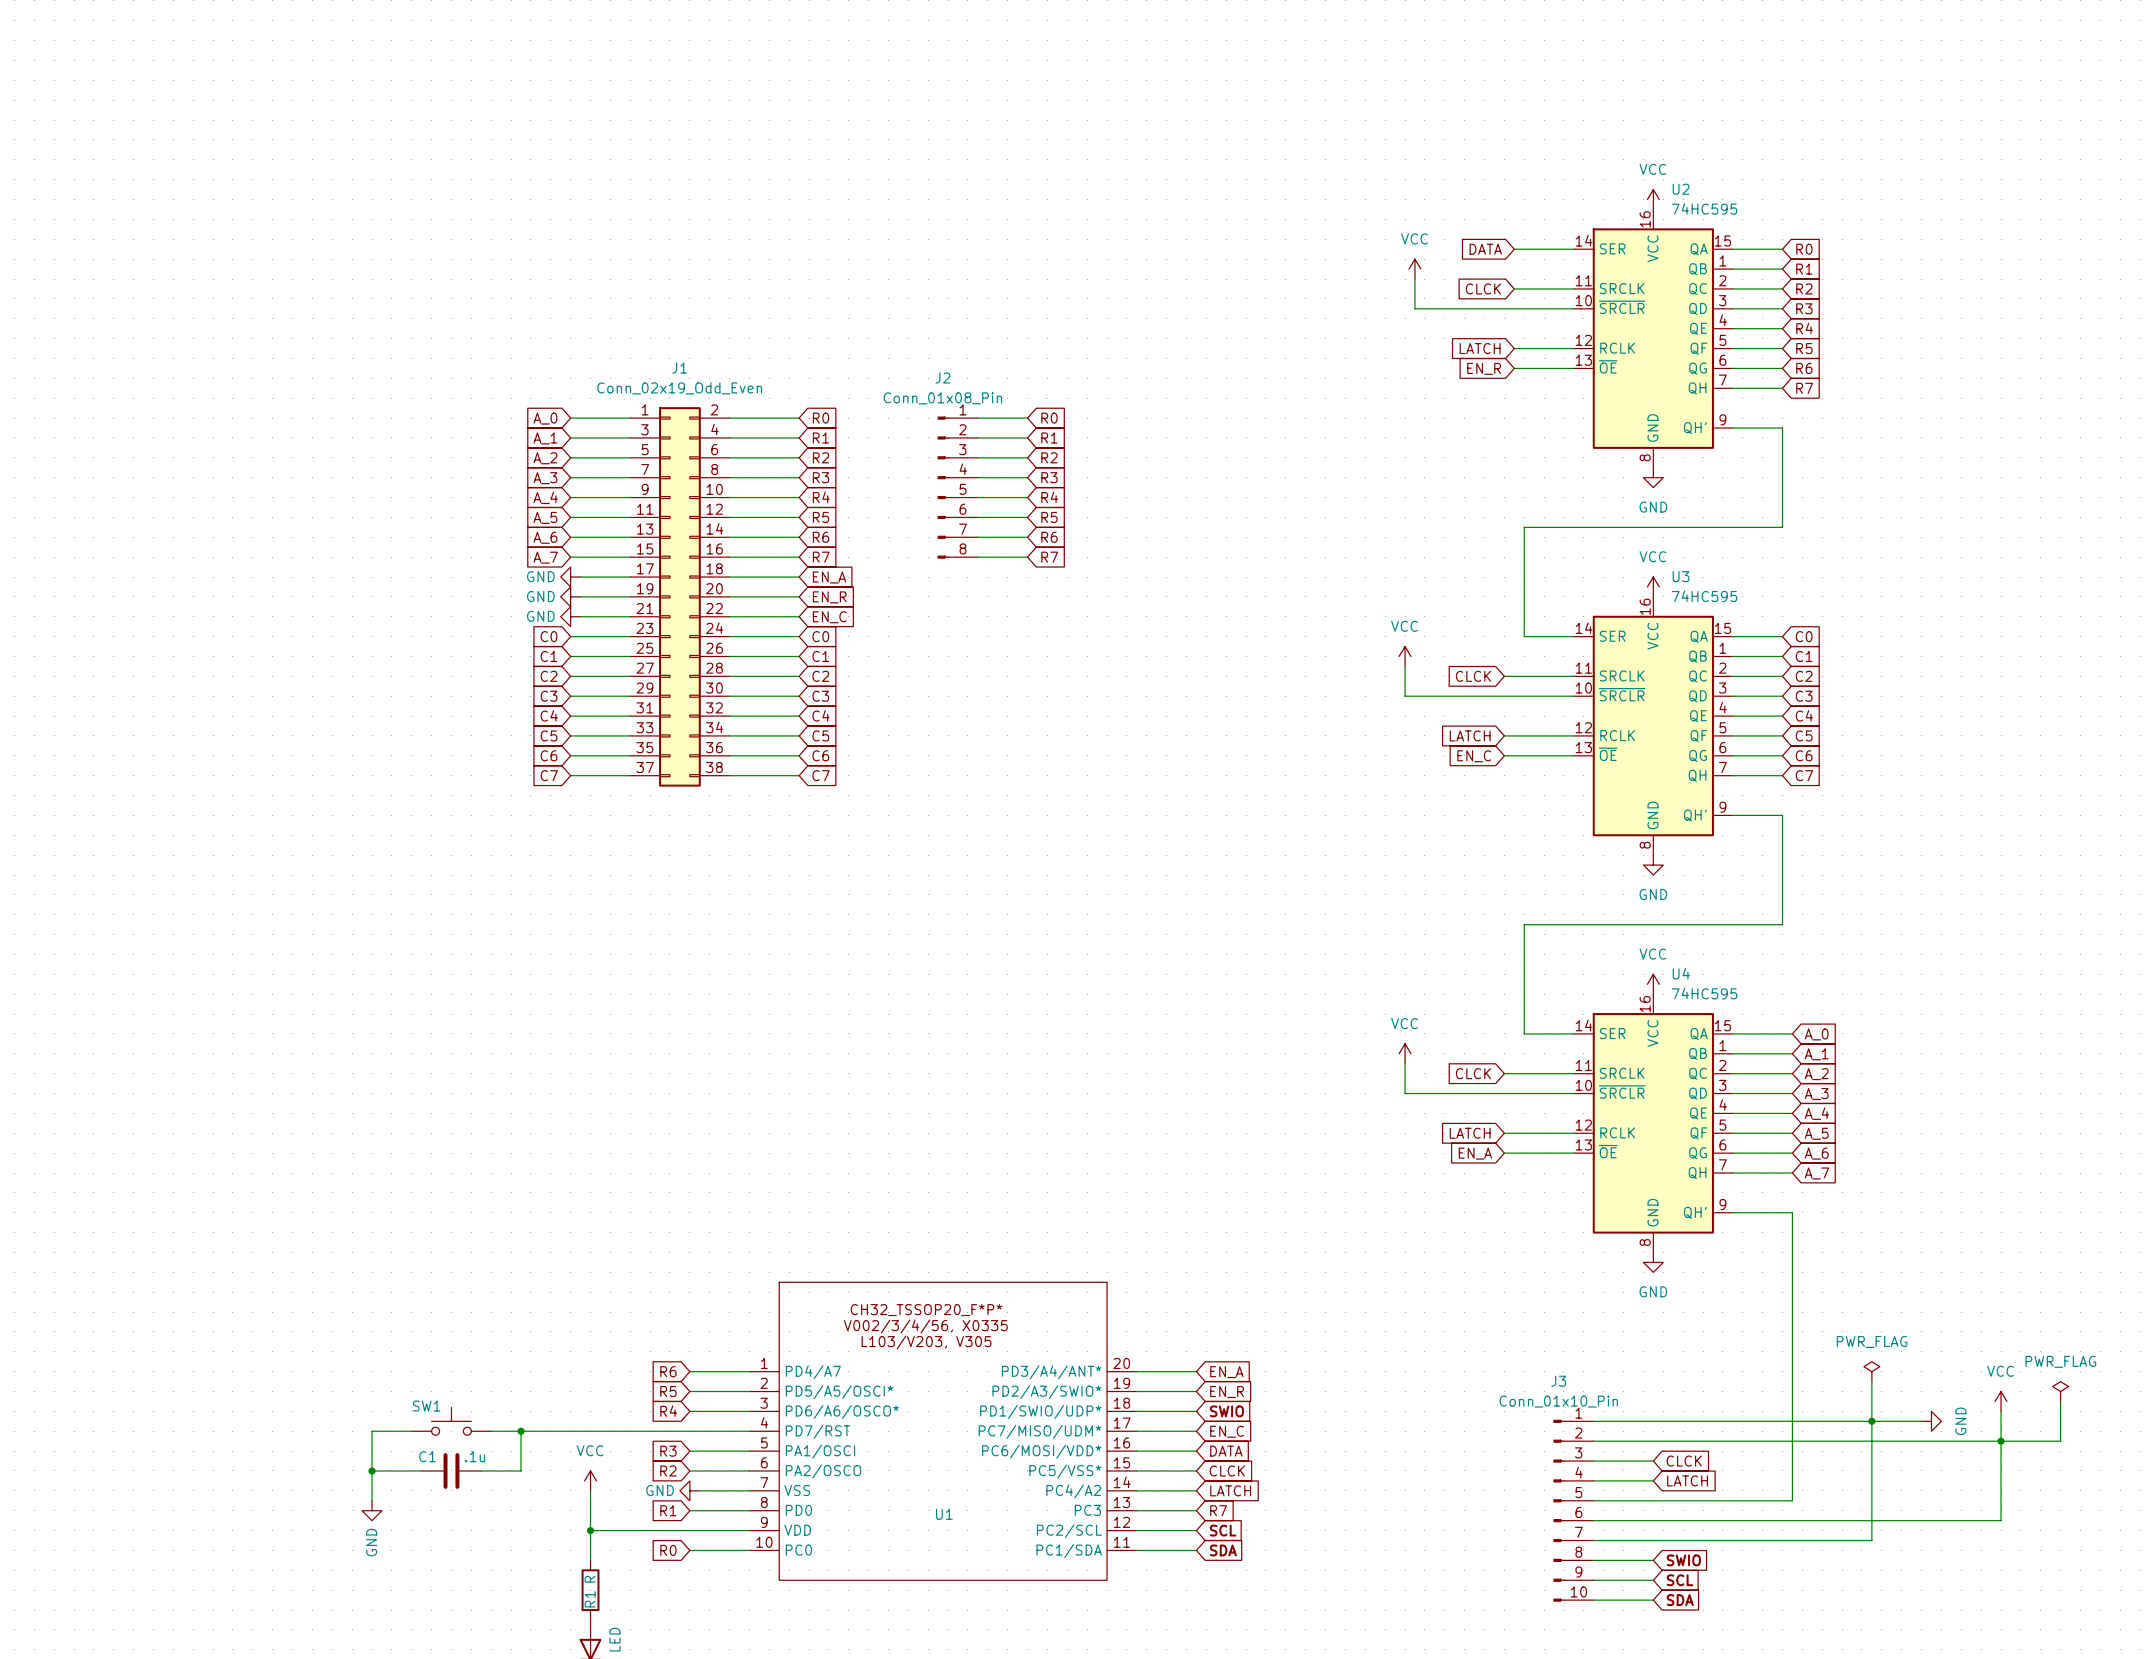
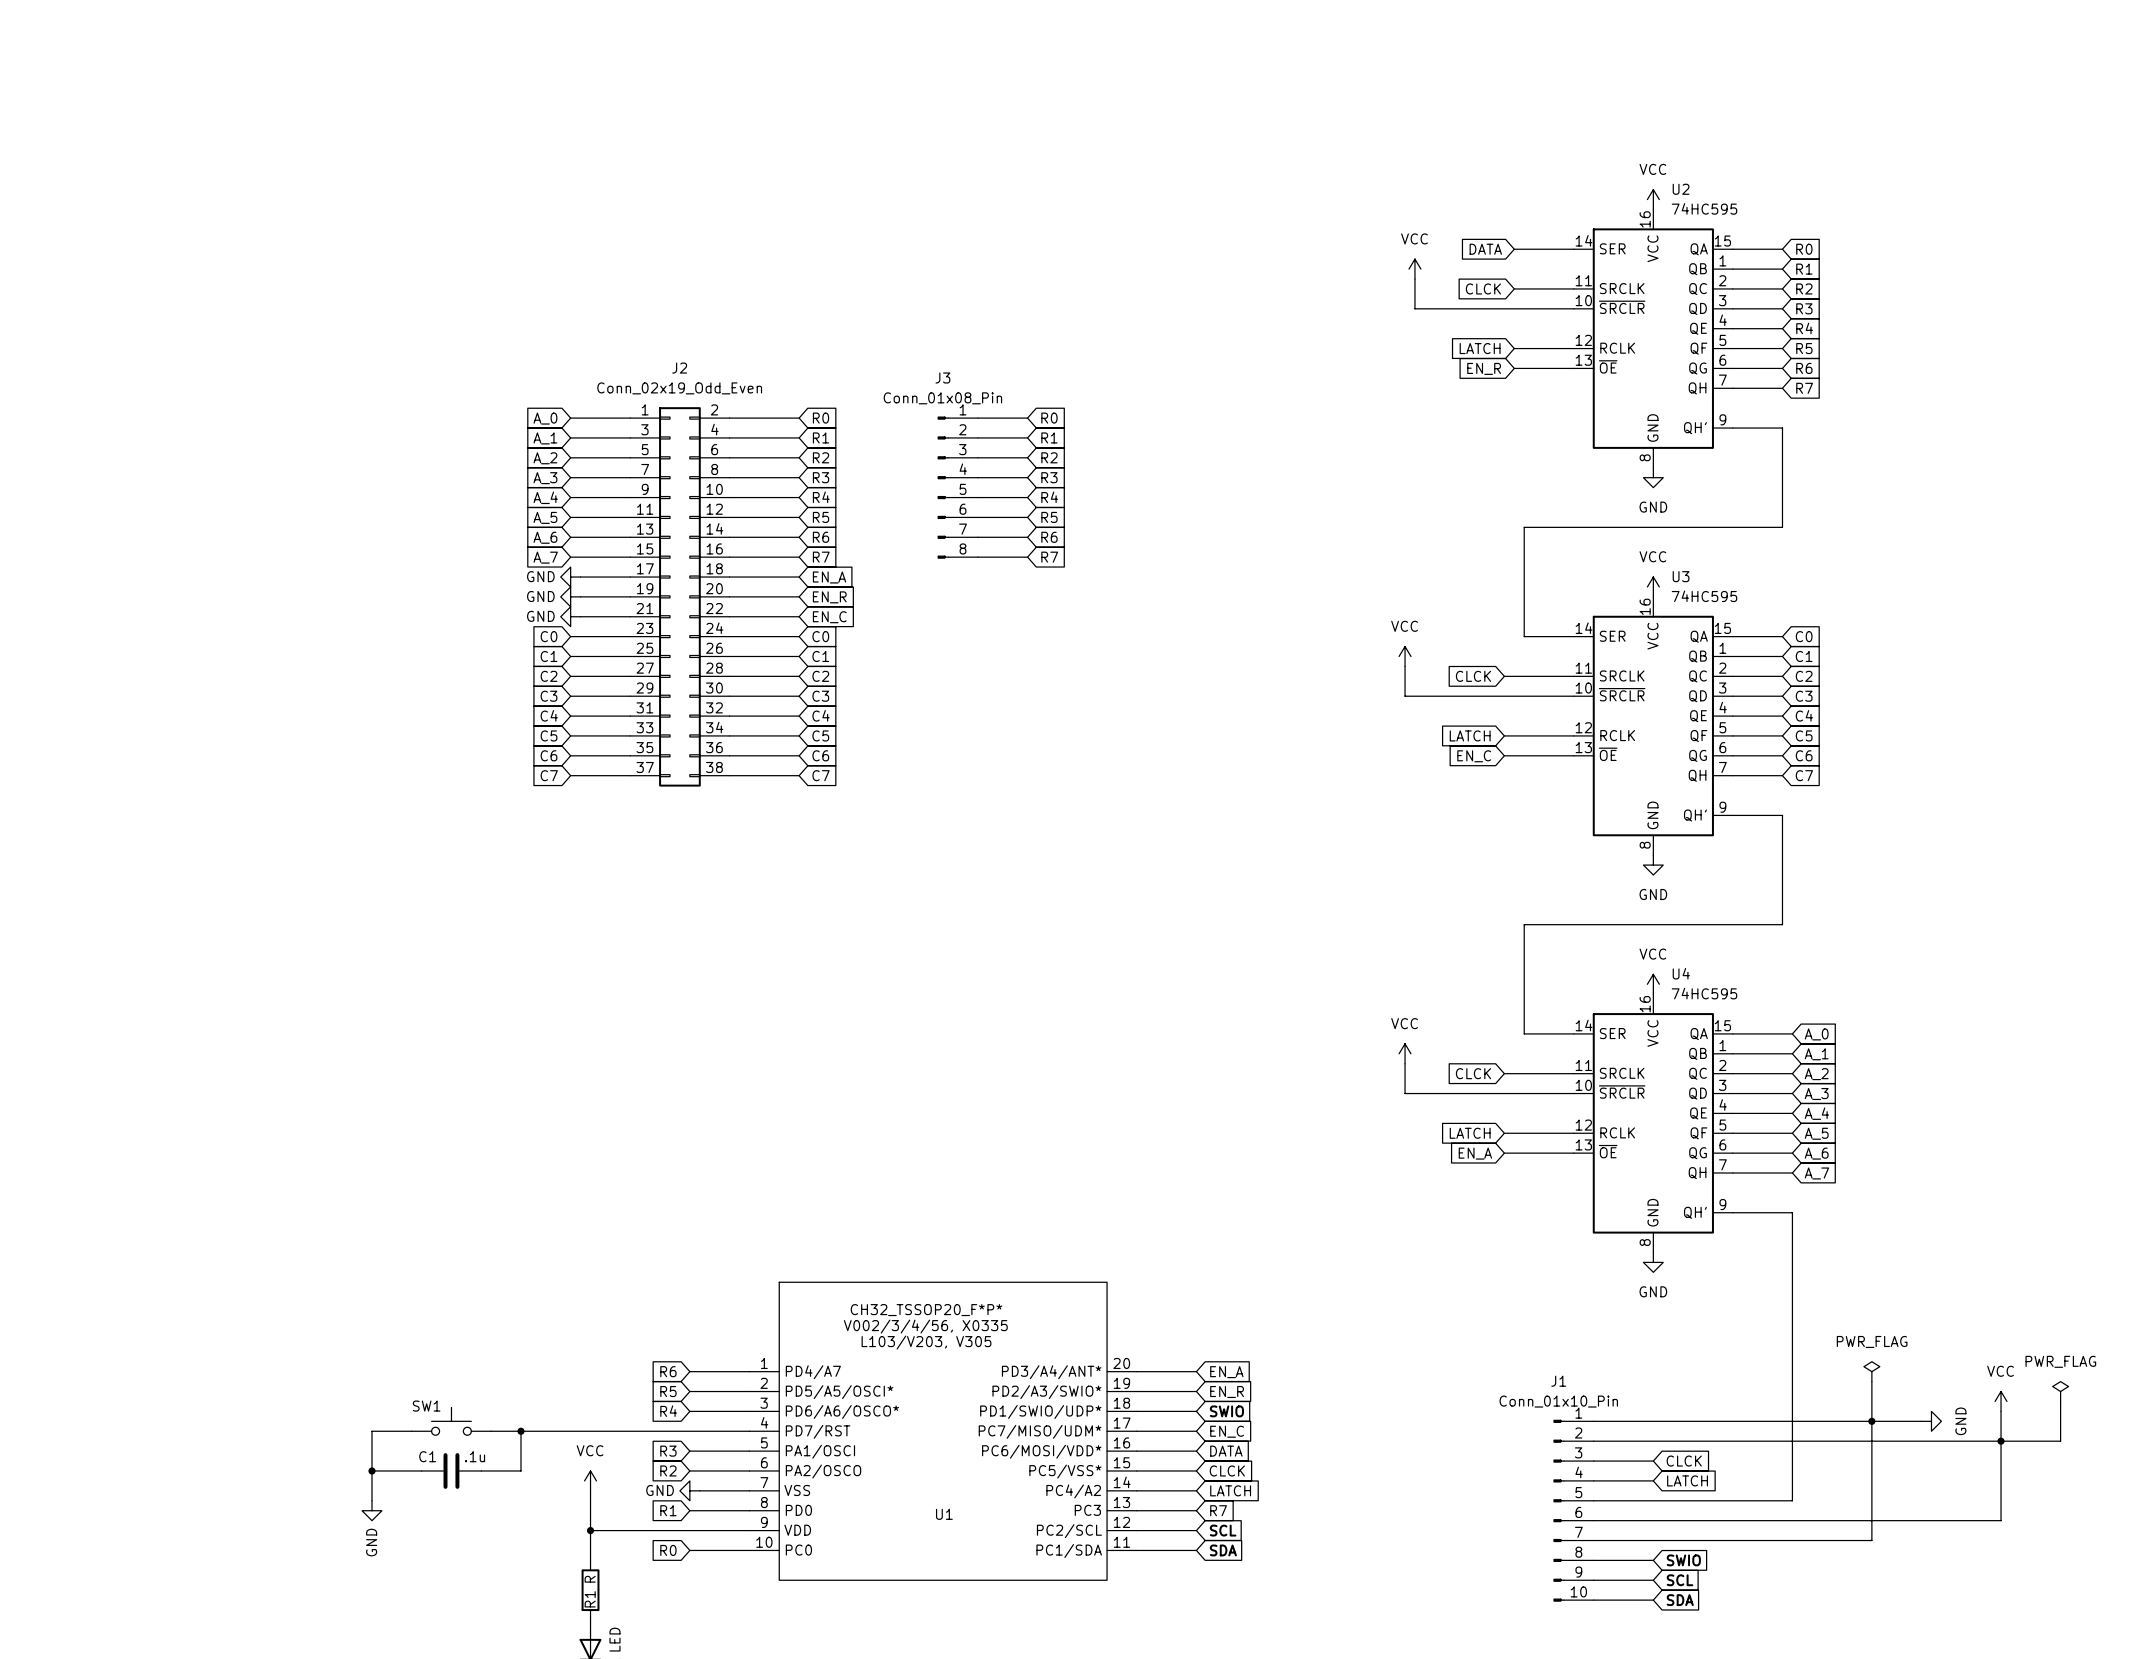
J1 name: J1 (679, 368) -> J2 (679, 368)
J2 name: J2 (942, 377) -> J3 (942, 377)
J3 name: J3 (1558, 1381) -> J1 (1558, 1381)

